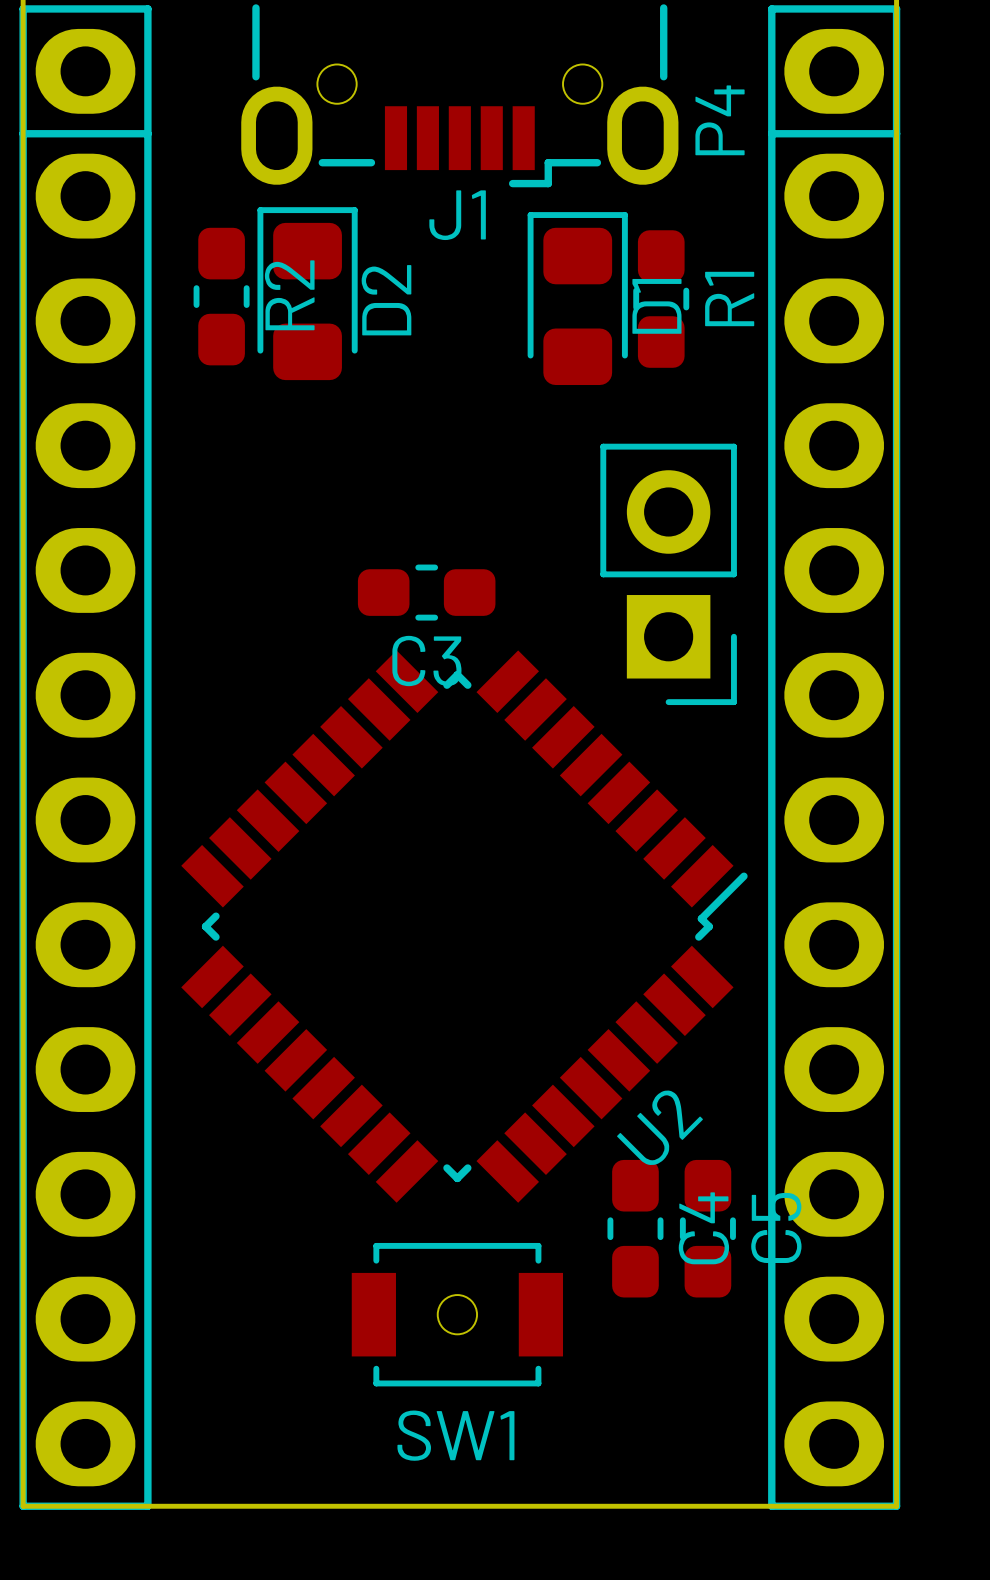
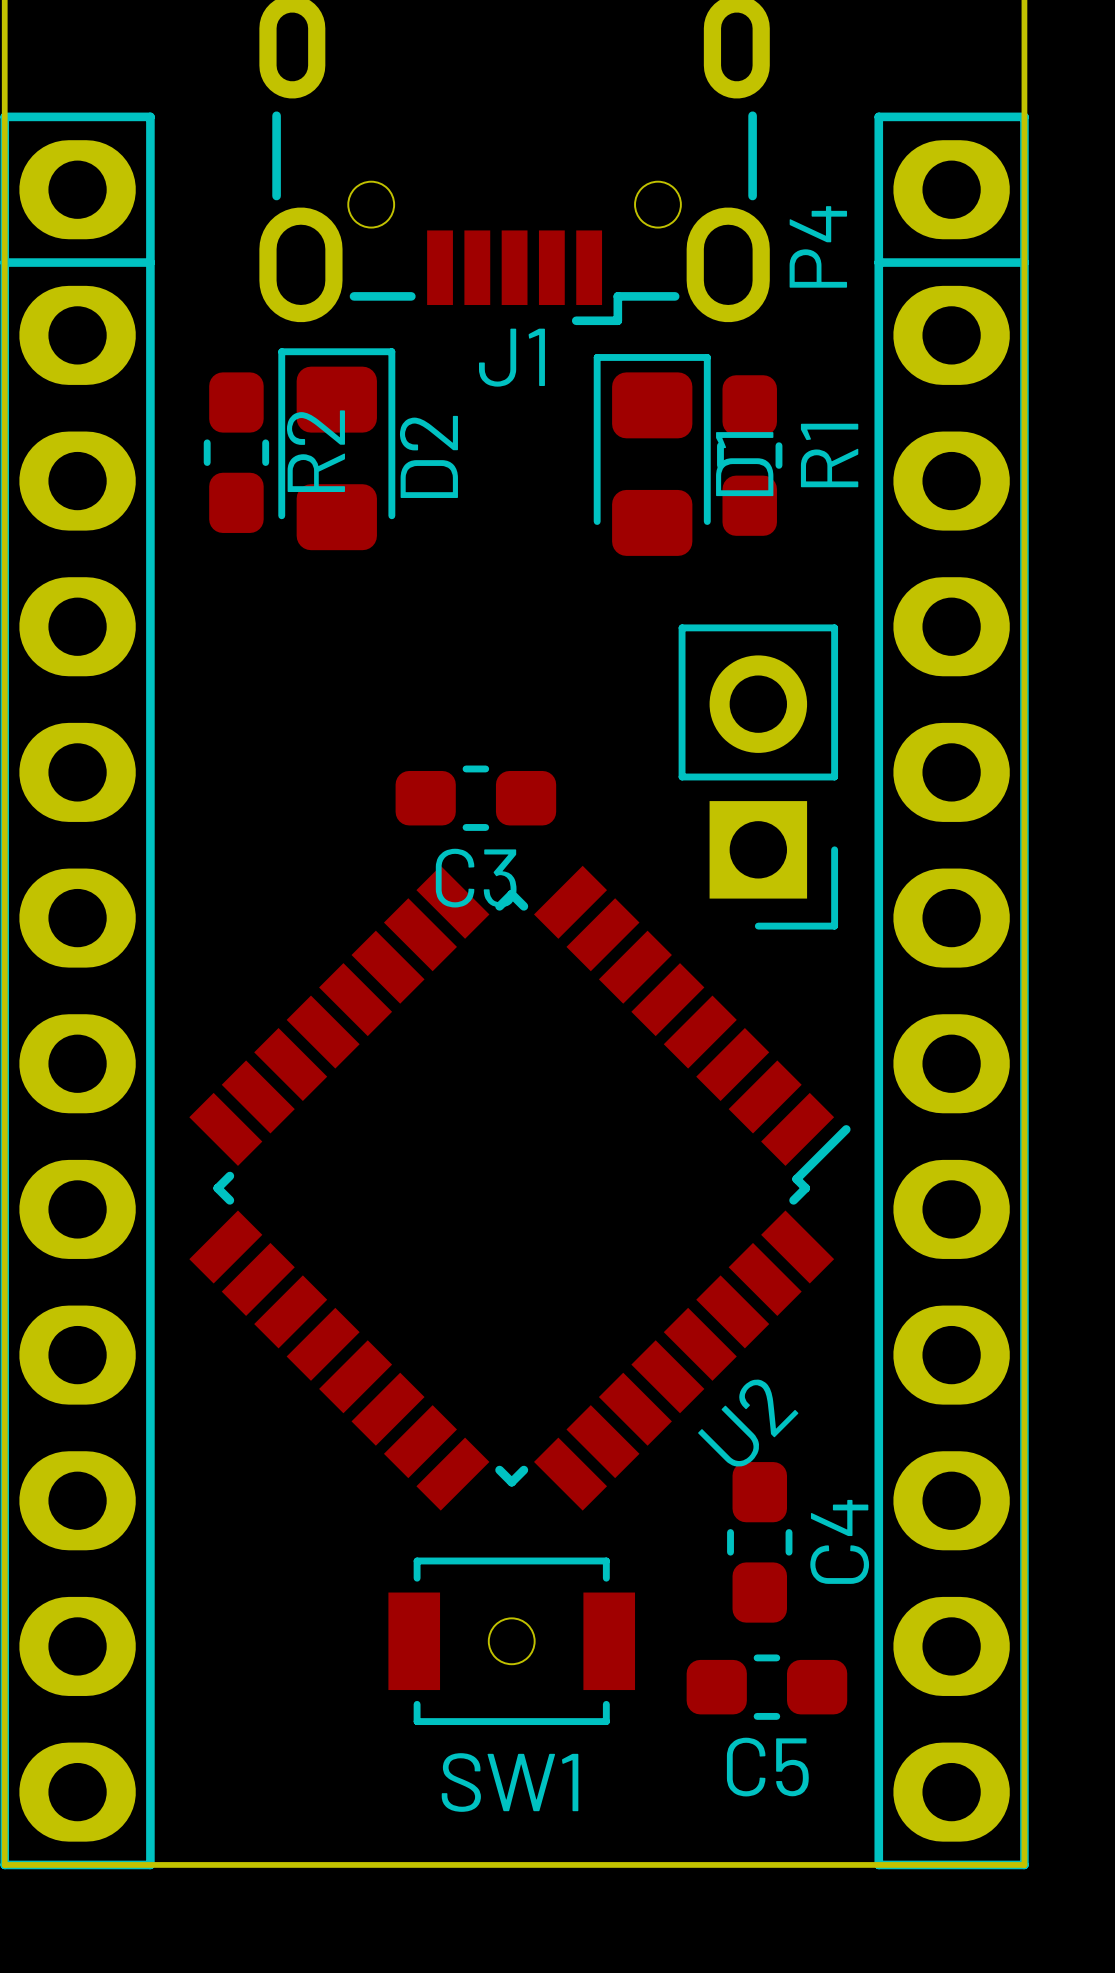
C4 position: (635, 1228) -> (759, 1542)
C5 rotation: 0° (707, 1228) -> 90° clockwise (766, 1687)
C5 position: (707, 1228) -> (766, 1687)

